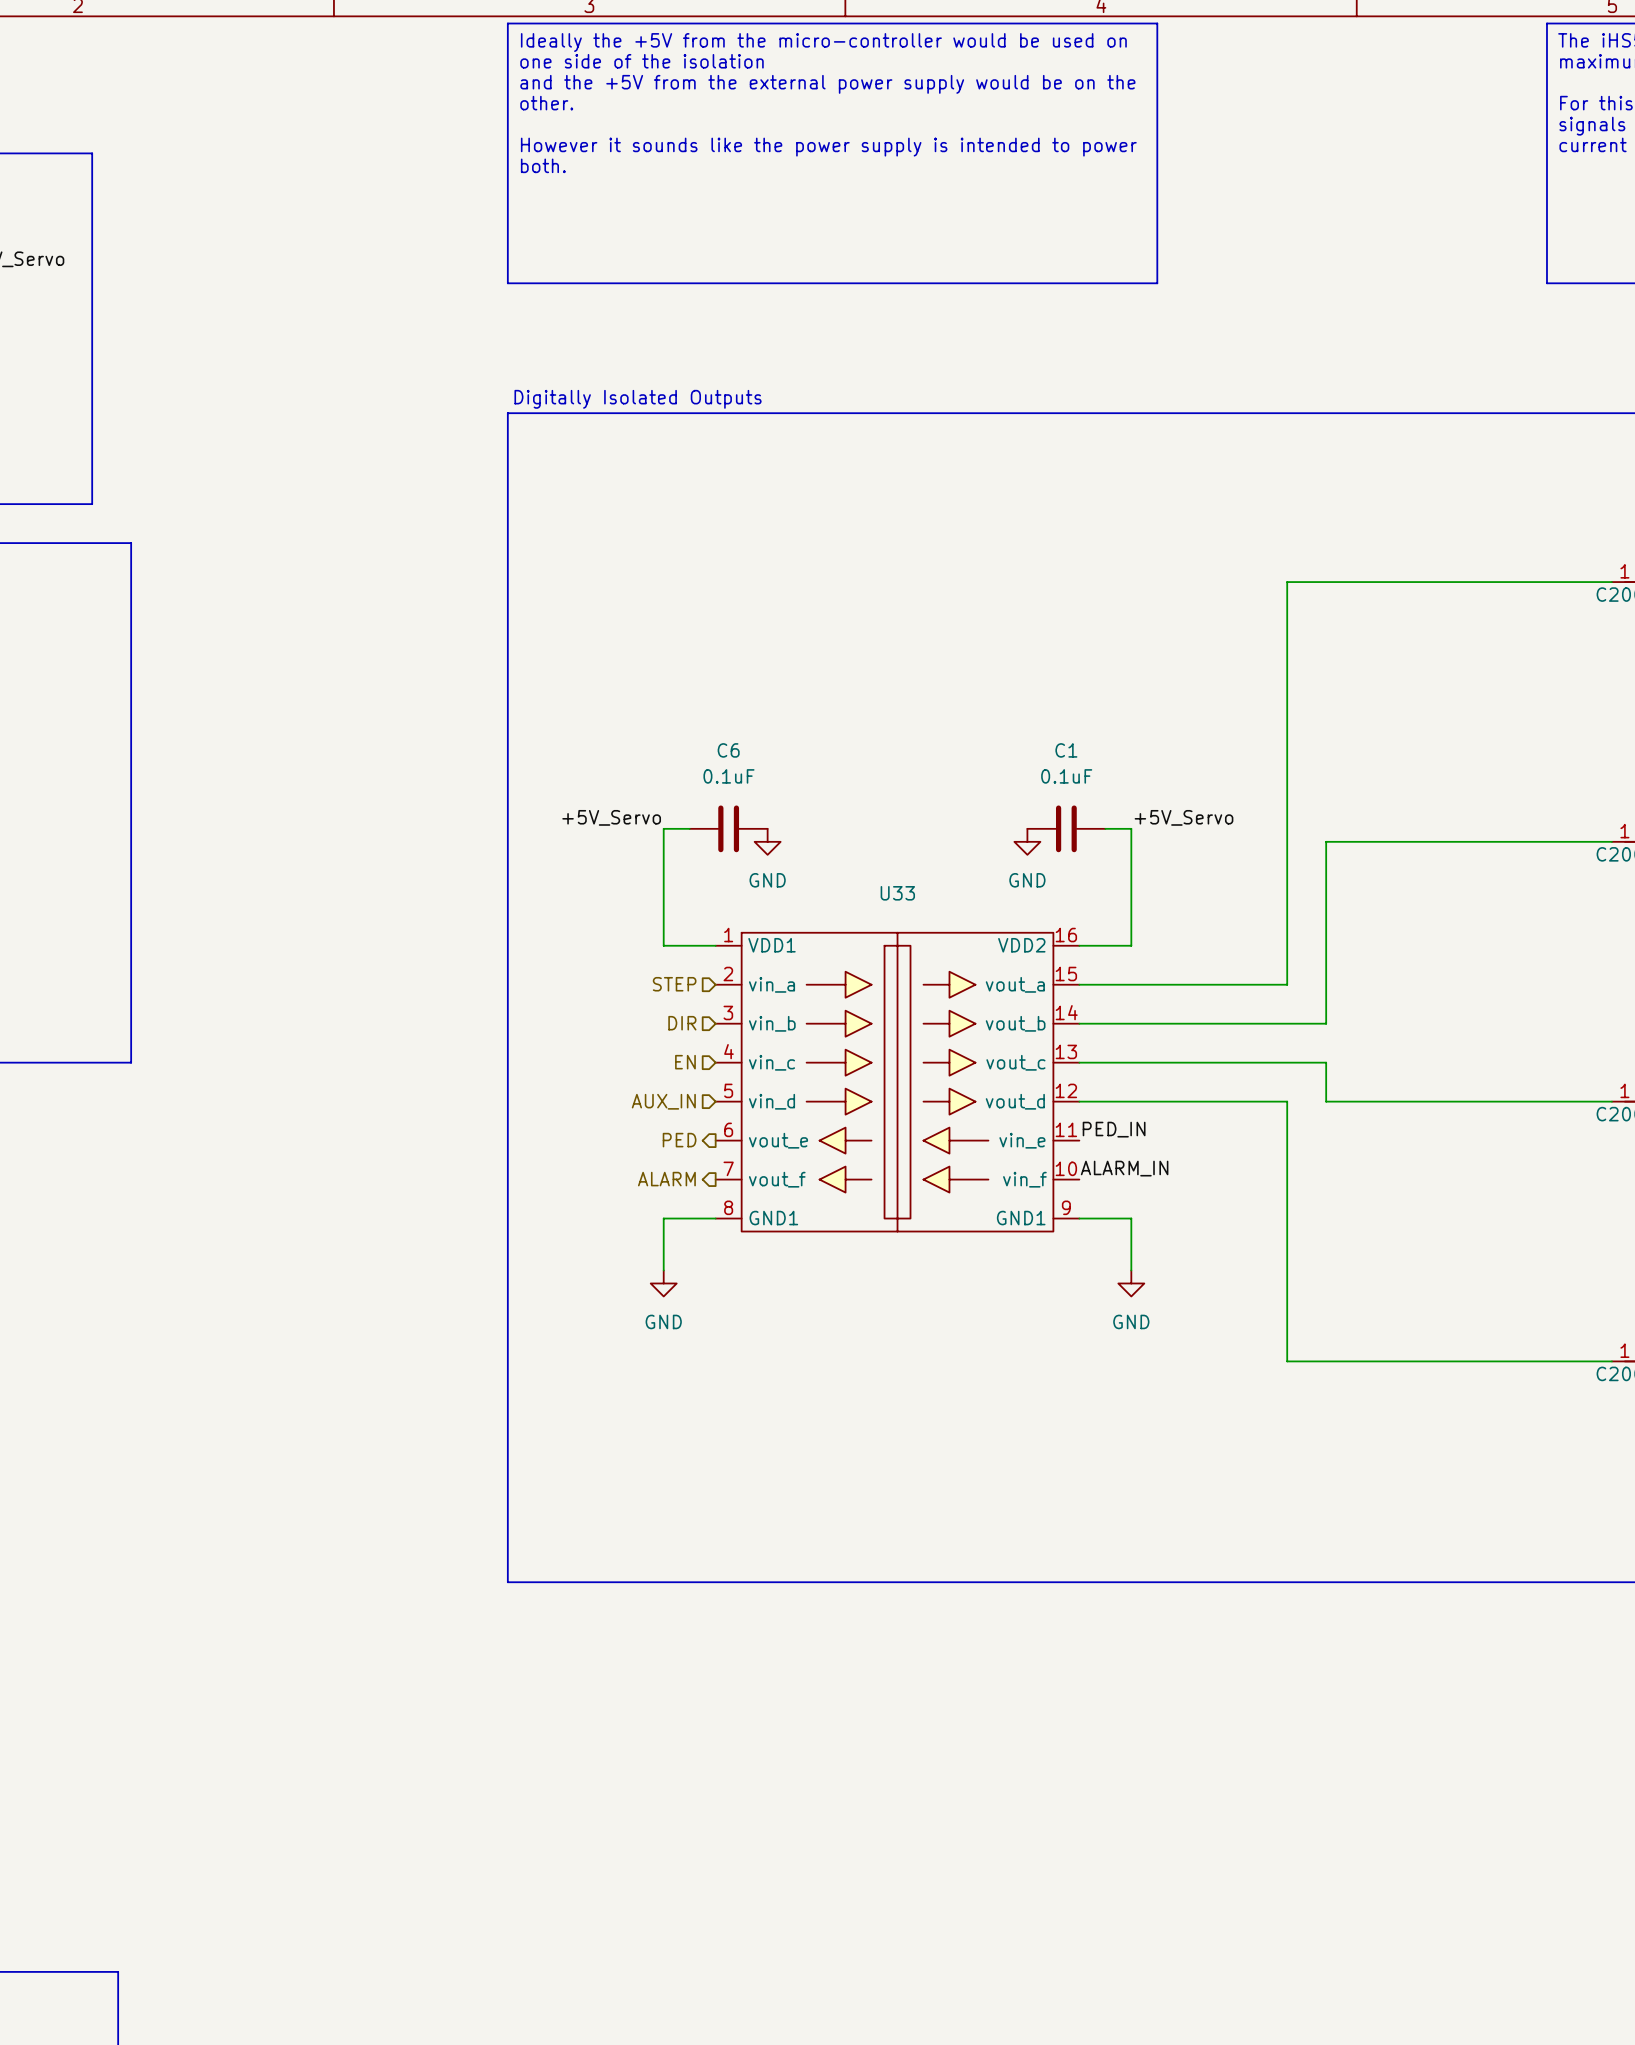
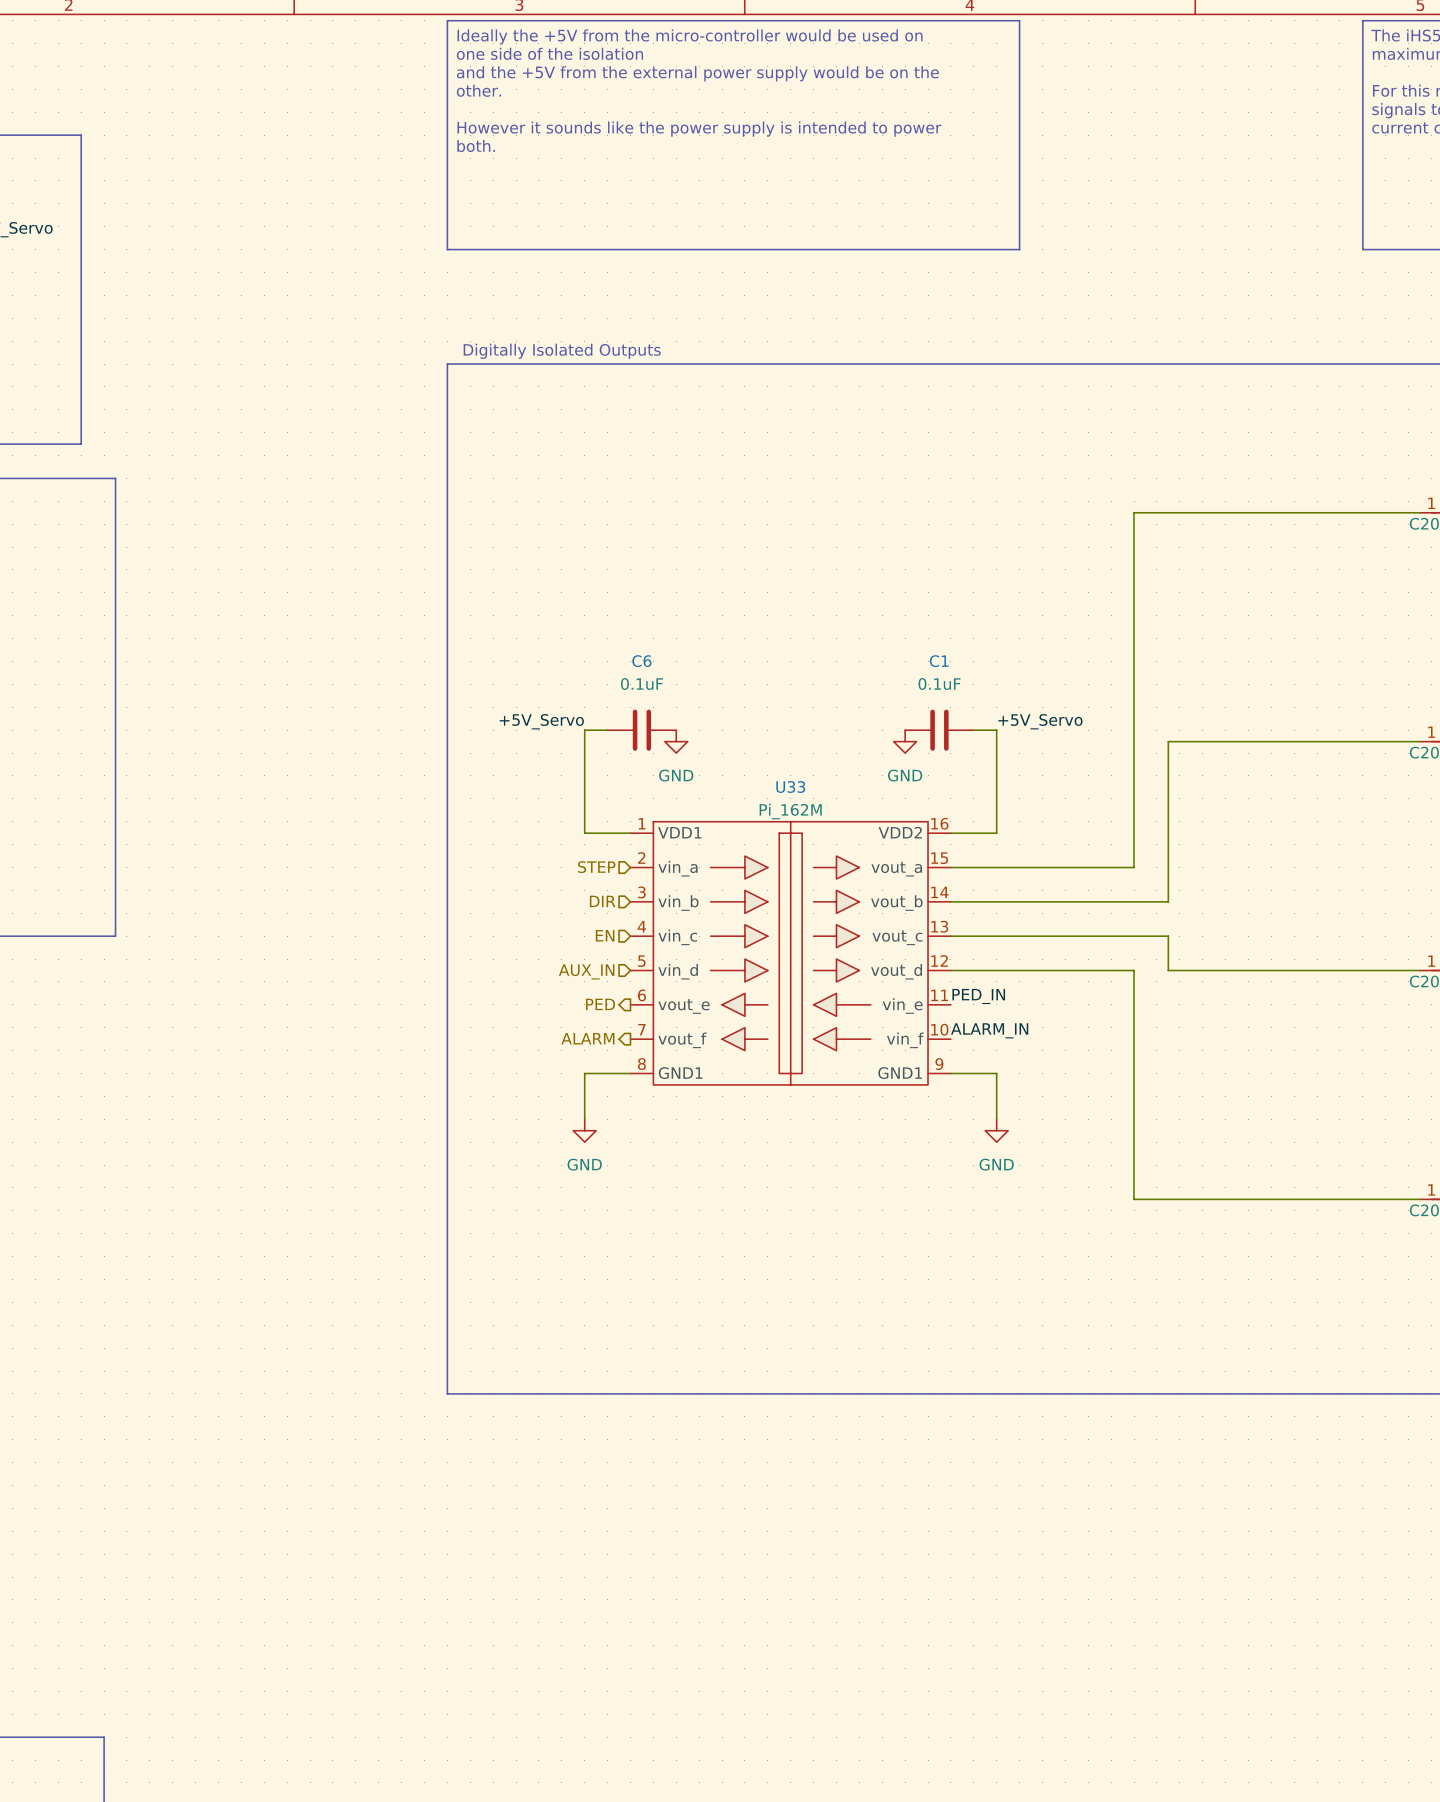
U33 value: none -> Pi_162M (790, 811)

